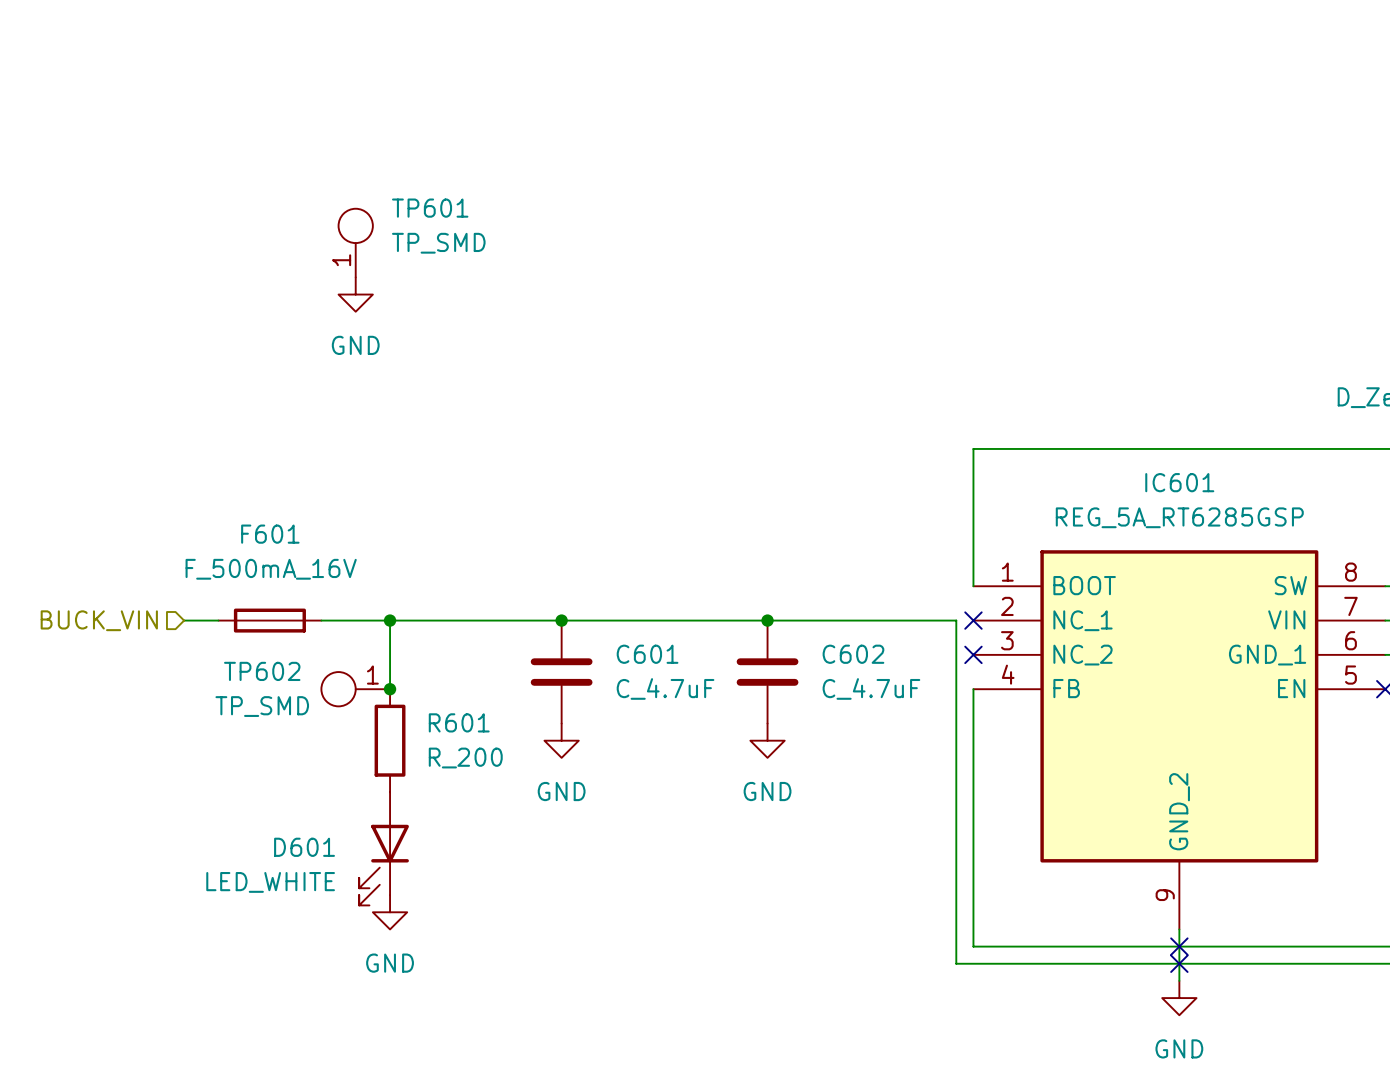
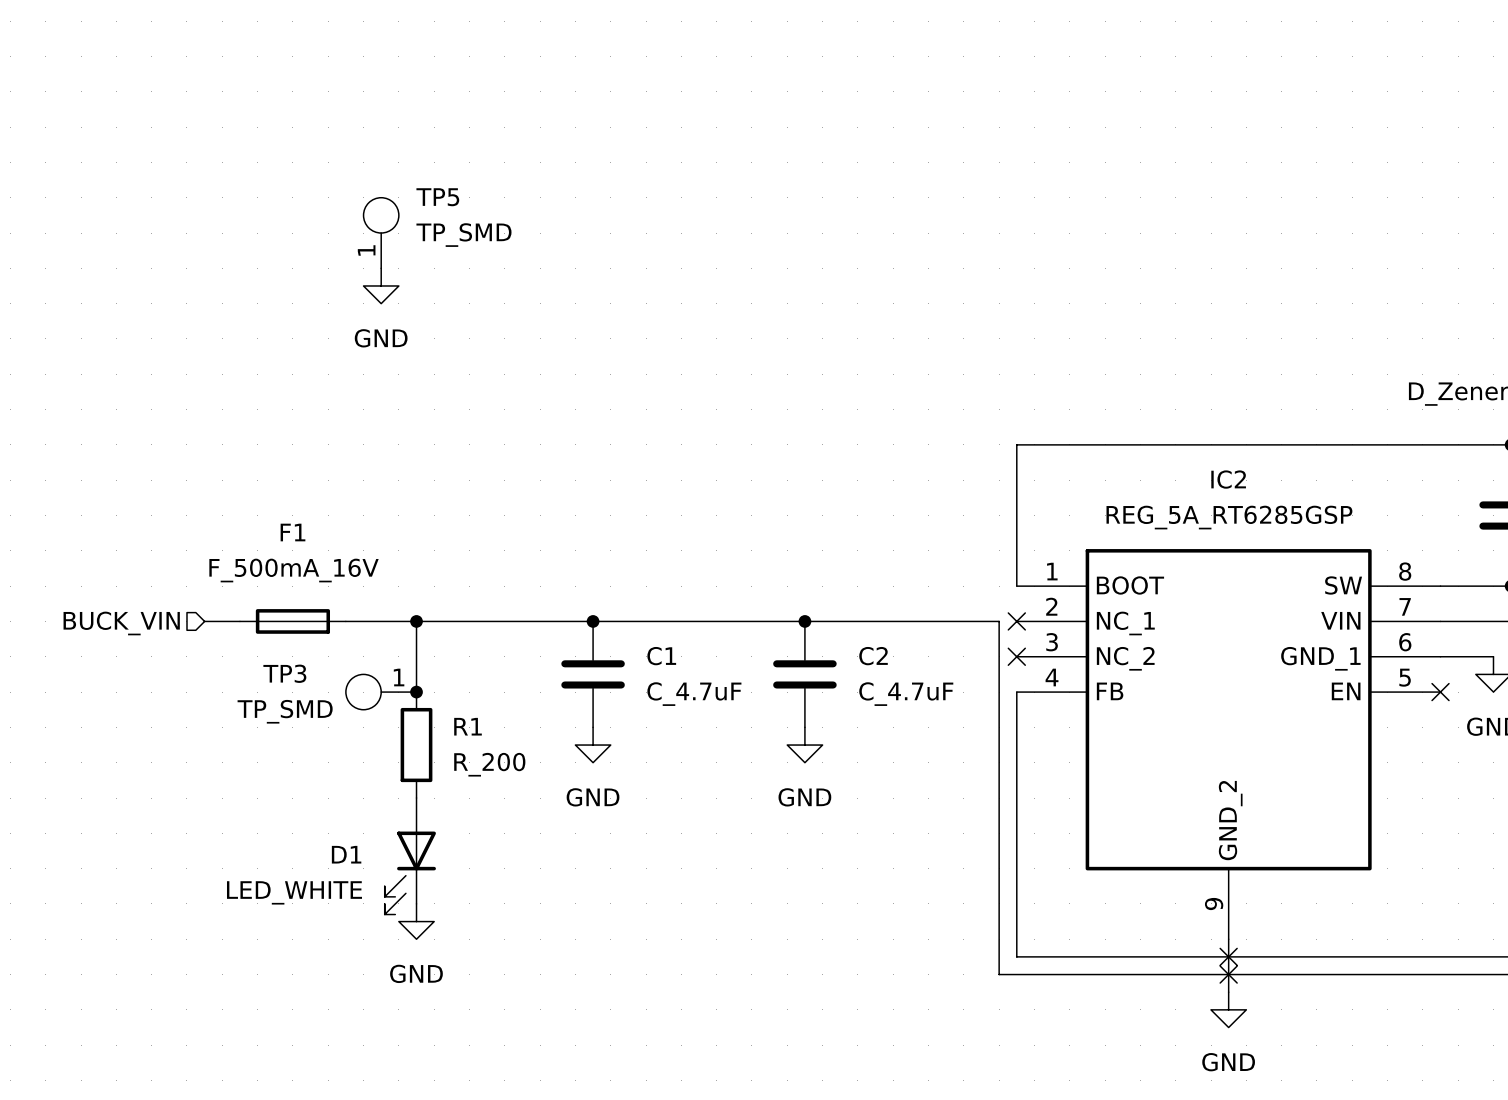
TP601 name: TP601 (430, 208) -> TP5 (437, 197)
IC601 name: IC601 (1179, 482) -> IC2 (1228, 479)
F601 name: F601 (270, 534) -> F1 (292, 532)
C601 name: C601 (647, 654) -> C1 (661, 656)
C602 name: C602 (853, 654) -> C2 (873, 656)
TP602 name: TP602 (262, 671) -> TP3 (284, 673)
R601 name: R601 (459, 722) -> R1 (468, 726)
D601 name: D601 (304, 847) -> D1 (346, 854)

